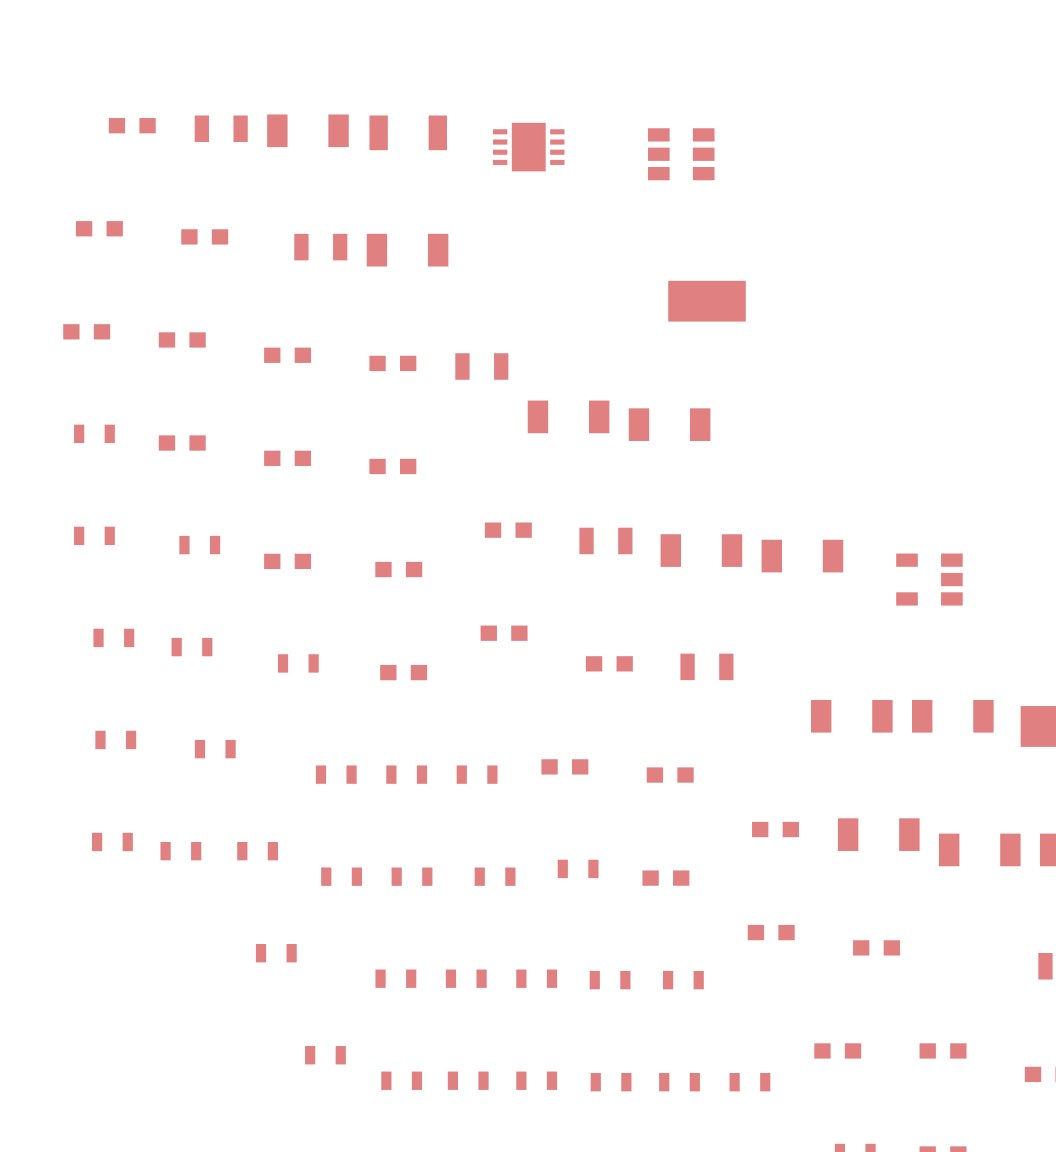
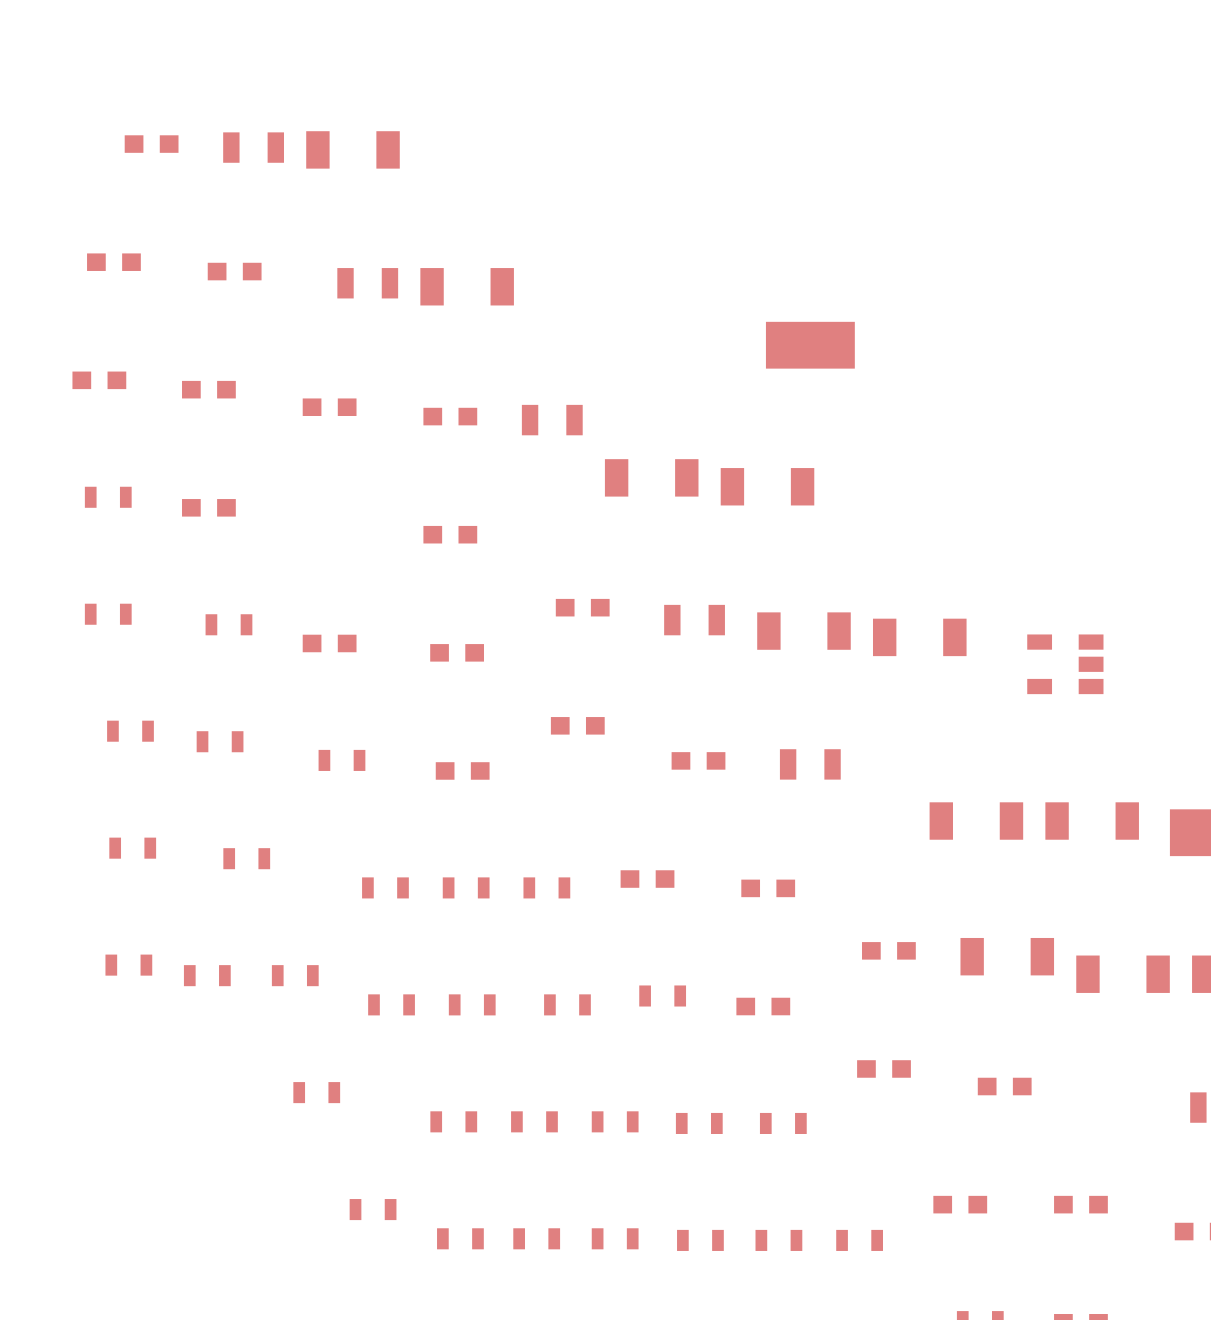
part: (408, 132) -> none
part: (528, 147) -> none
part: (681, 154) -> none
part: (287, 458) -> none

